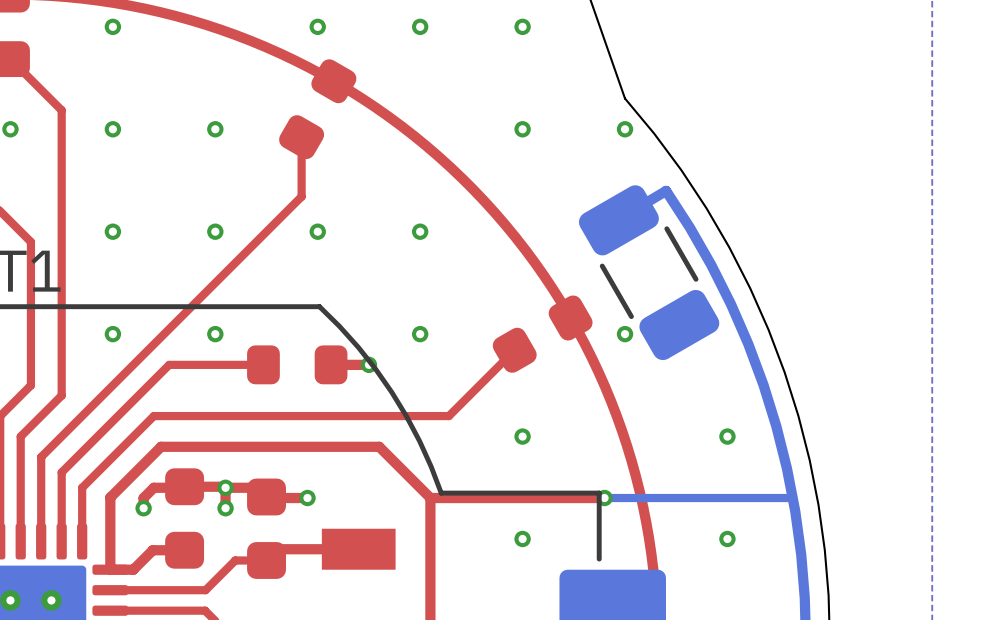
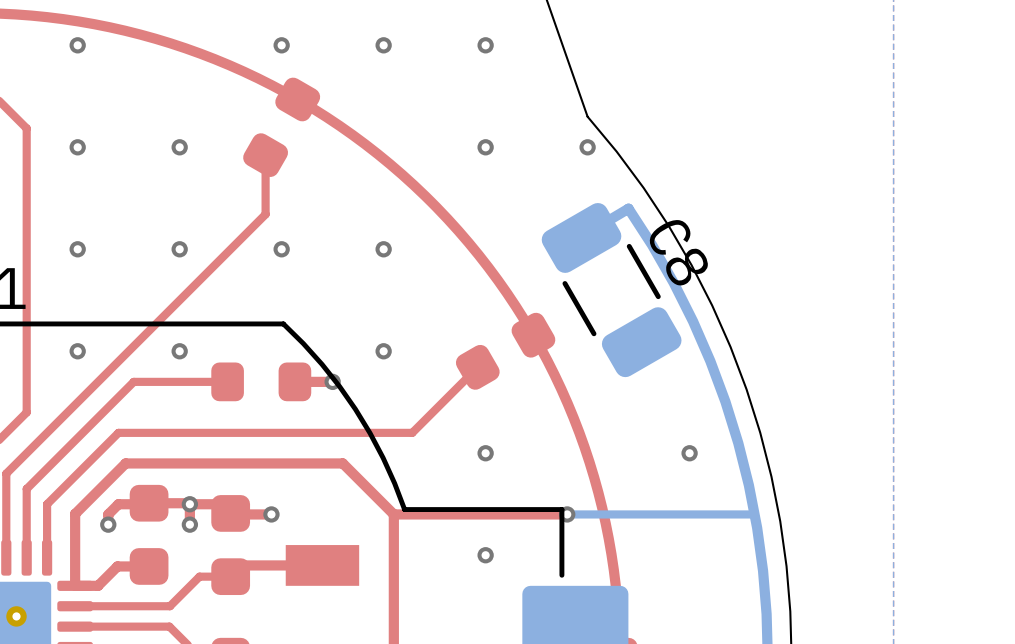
C8 name: none -> C8 (678, 252)
via: (625, 334) -> none
via: (727, 538) -> none

